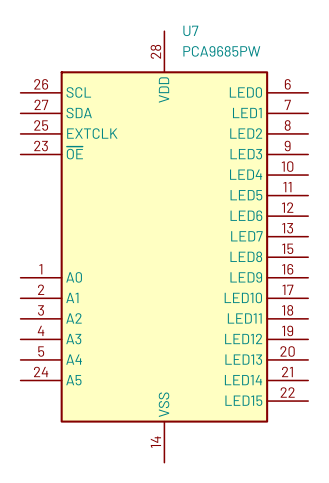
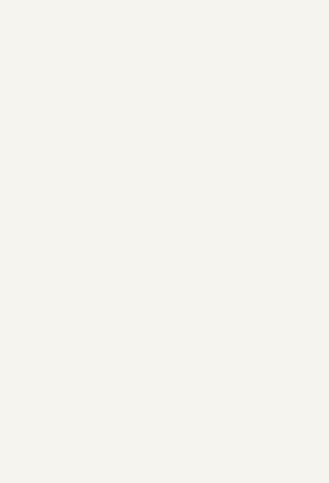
U7: PCA9685PW (164, 246) -> none

